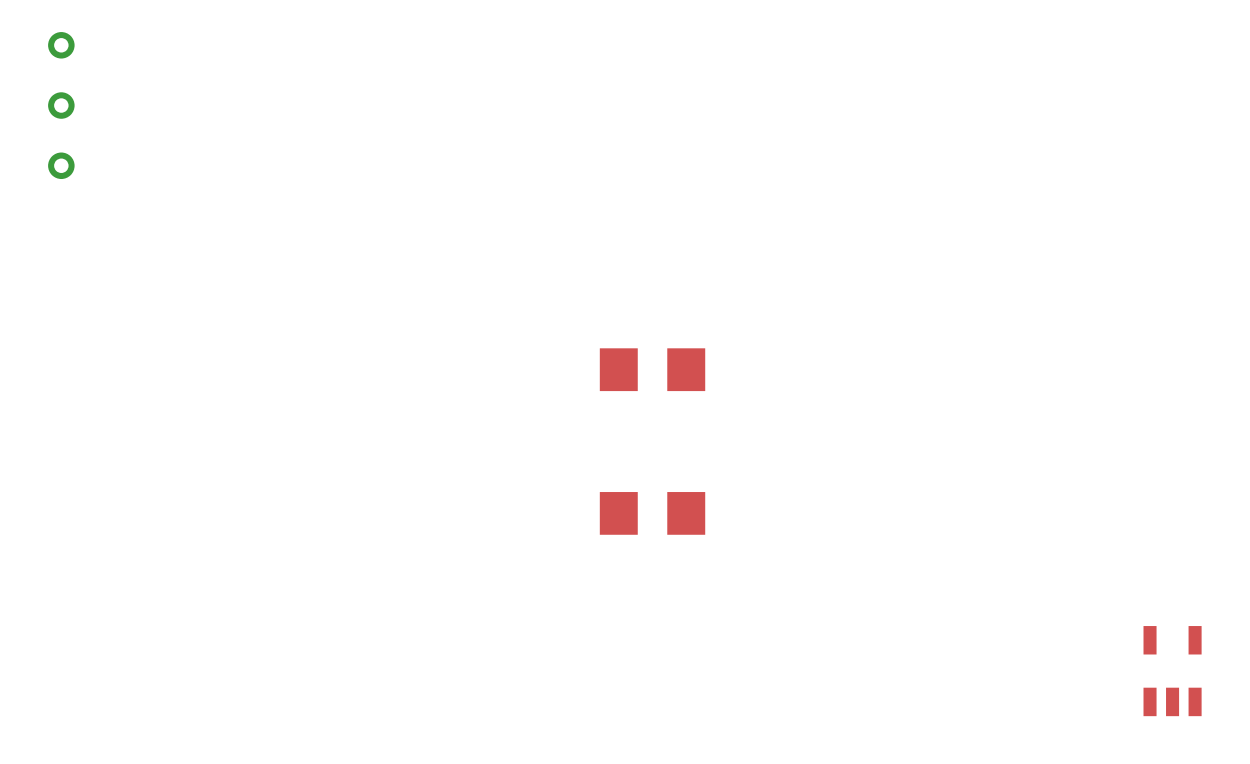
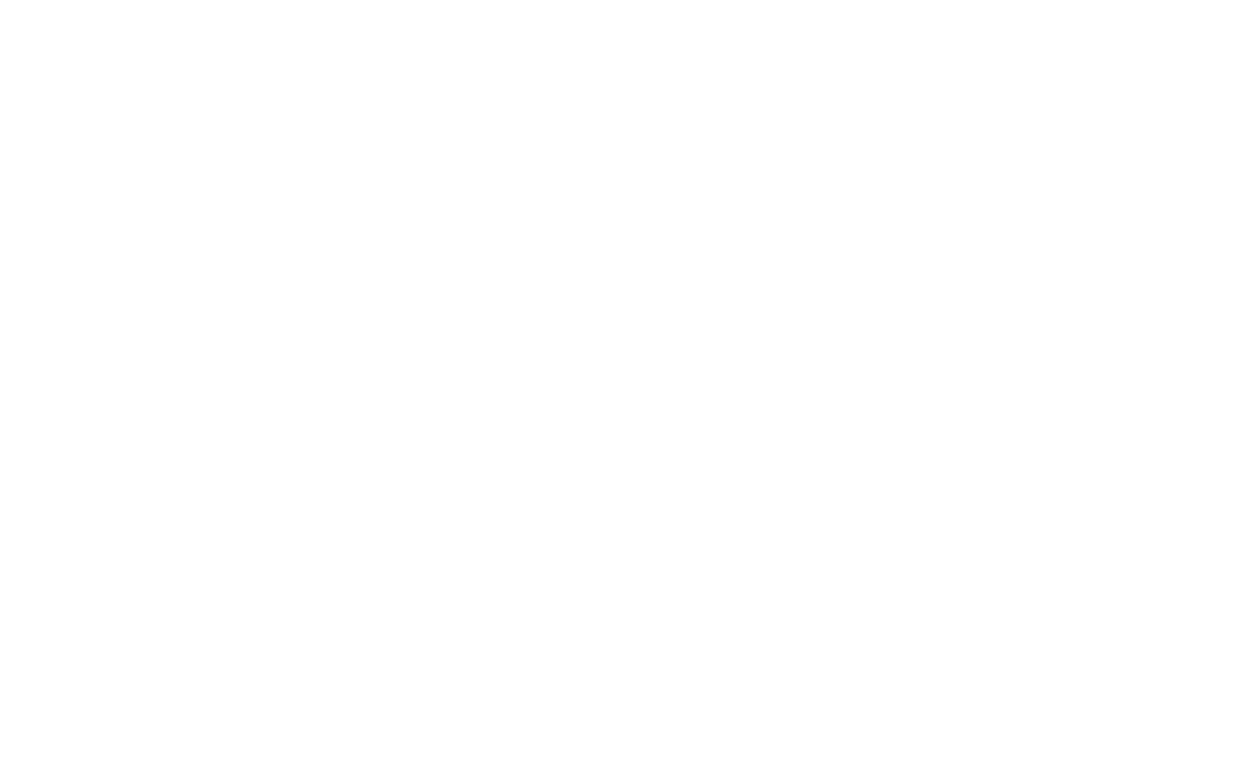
part: (61, 105) -> none
part: (652, 369) -> none
part: (652, 513) -> none
part: (1172, 671) -> none

